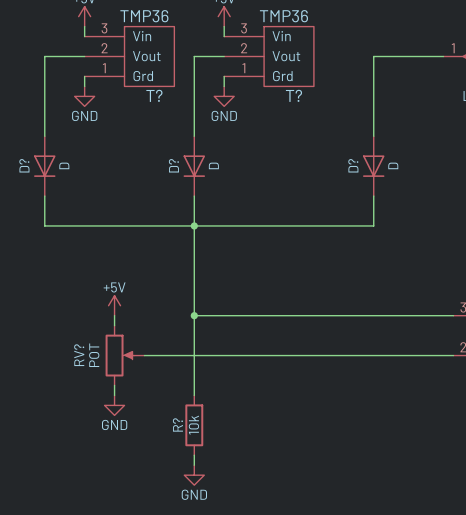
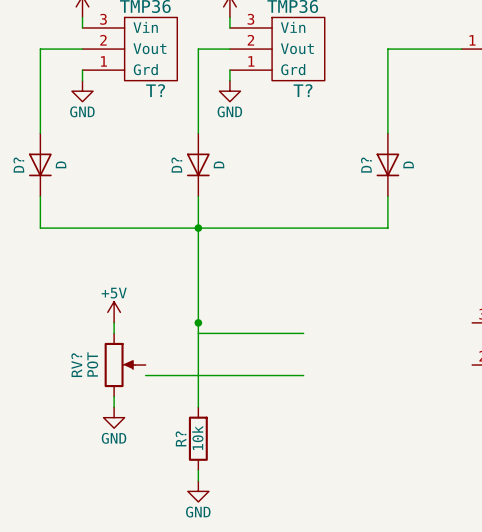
wire: (194, 315) (453, 315) -> none
wire: none -> (198, 333) (303, 333)
wire: (144, 355) (453, 355) -> none
wire: none -> (145, 375) (303, 375)

